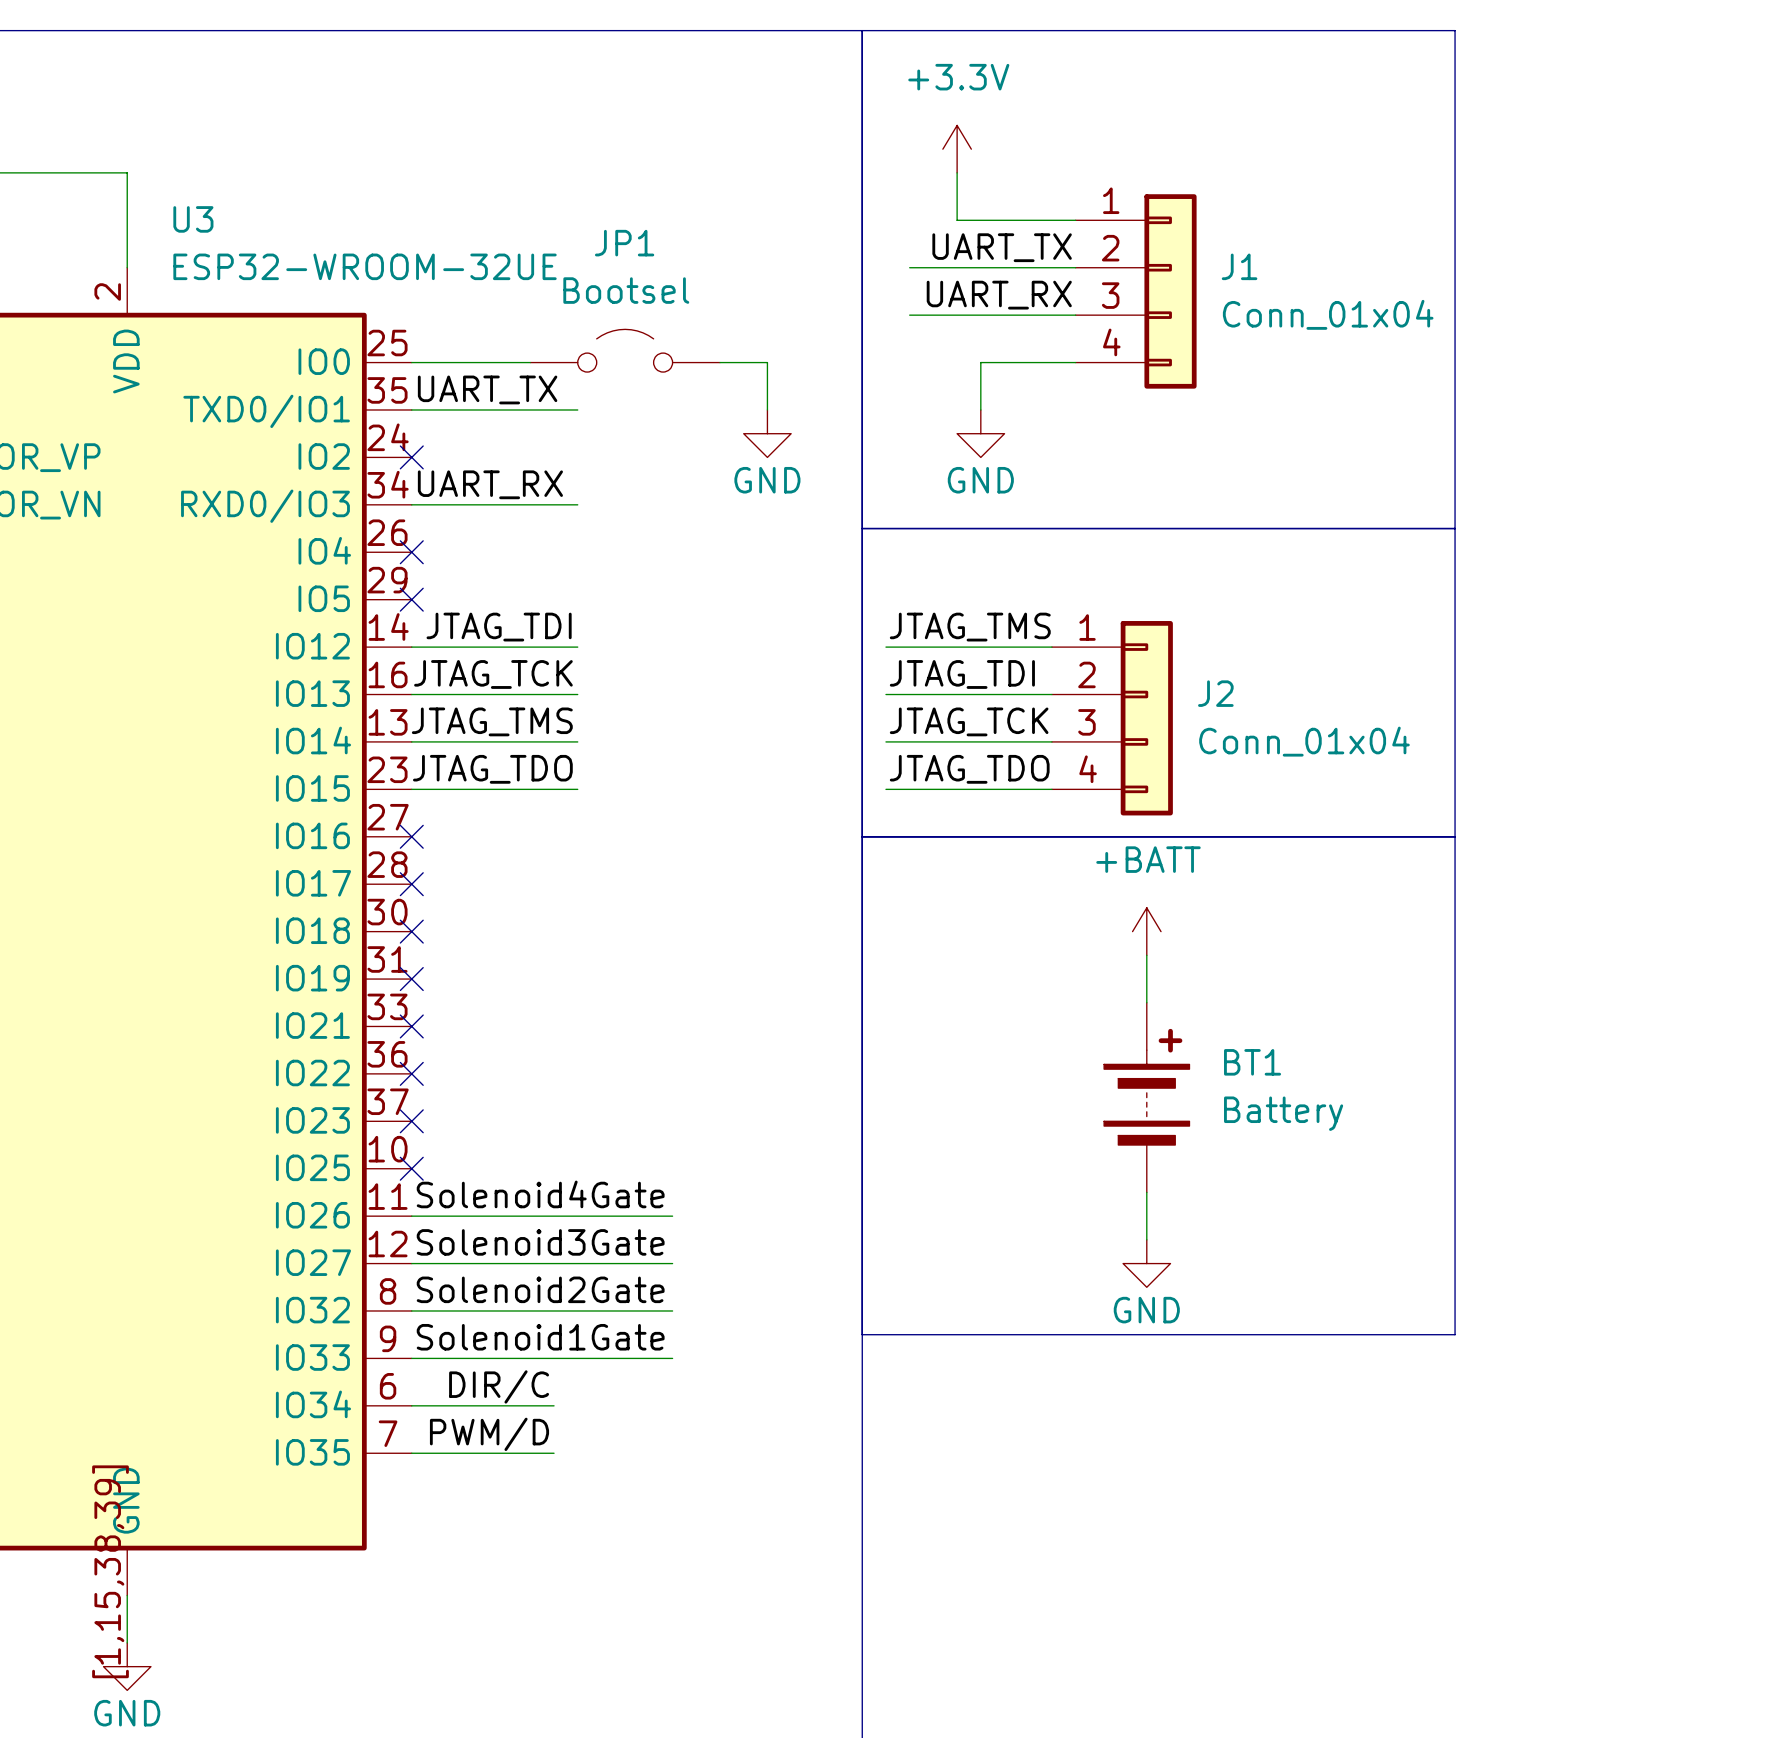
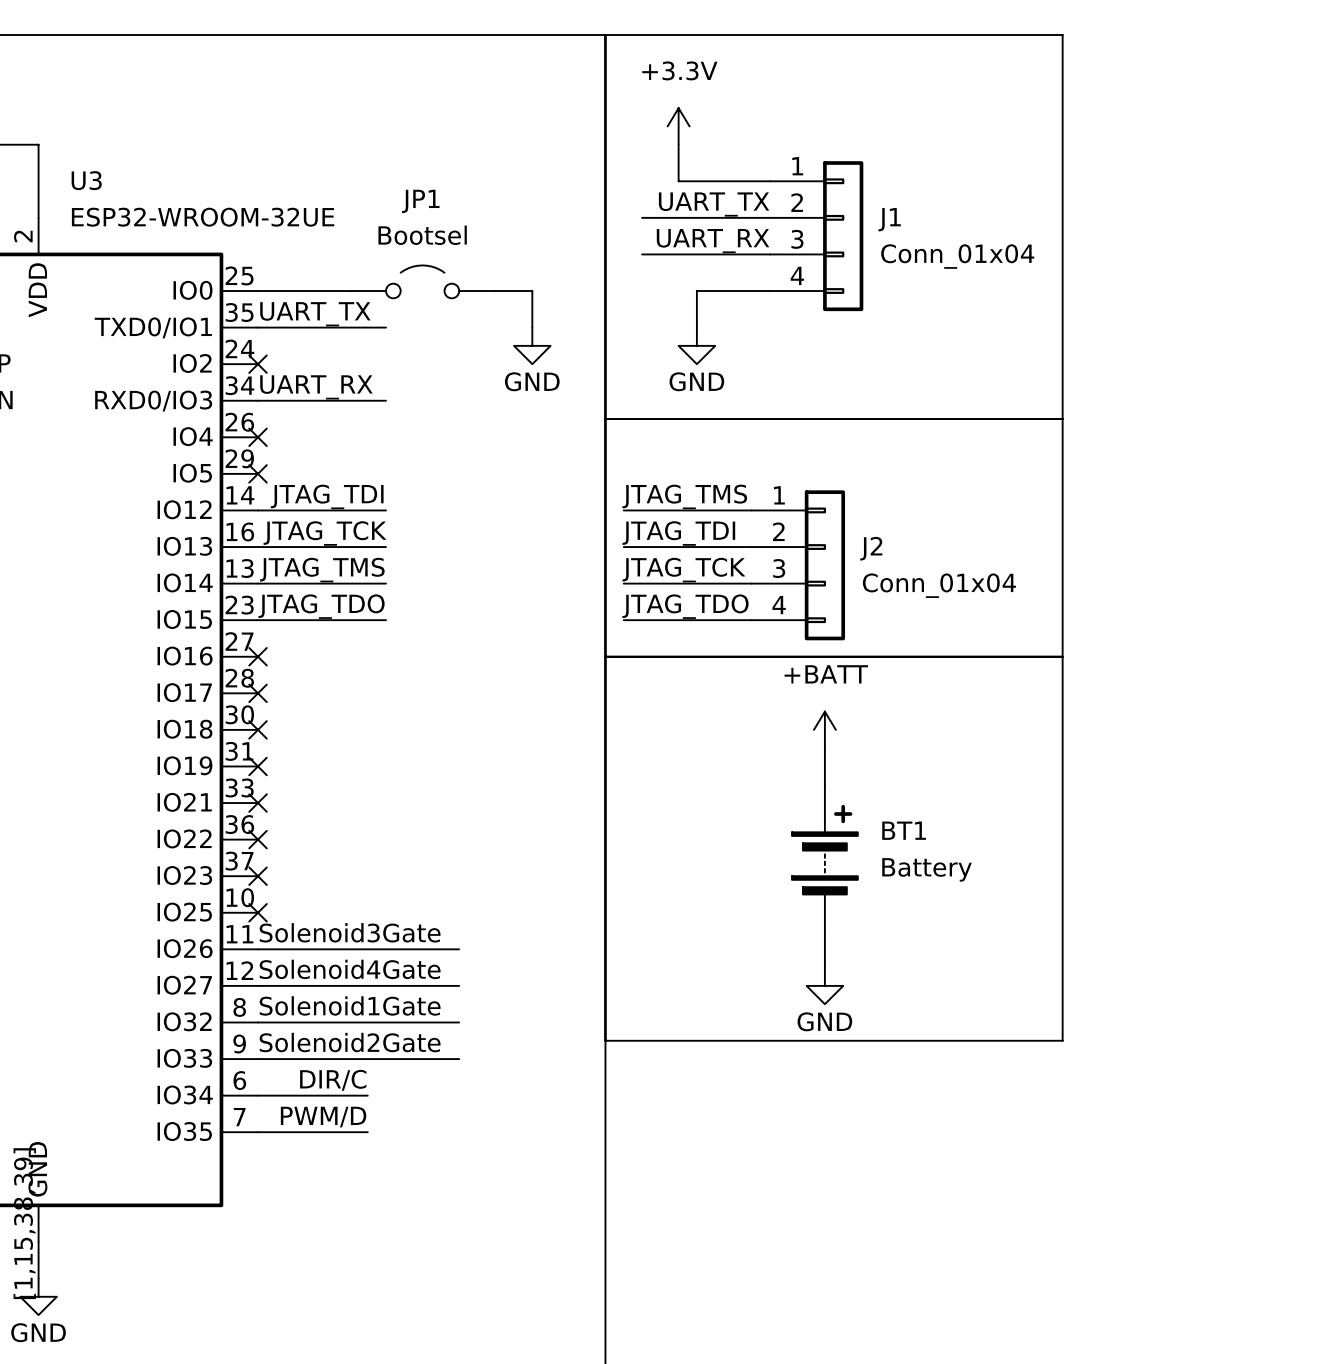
label: Solenoid4Gate (540, 1194) -> Solenoid3Gate (350, 932)
label: Solenoid3Gate (540, 1242) -> Solenoid4Gate (350, 969)
label: Solenoid2Gate (540, 1289) -> Solenoid1Gate (350, 1005)
label: Solenoid1Gate (540, 1337) -> Solenoid2Gate (350, 1042)

